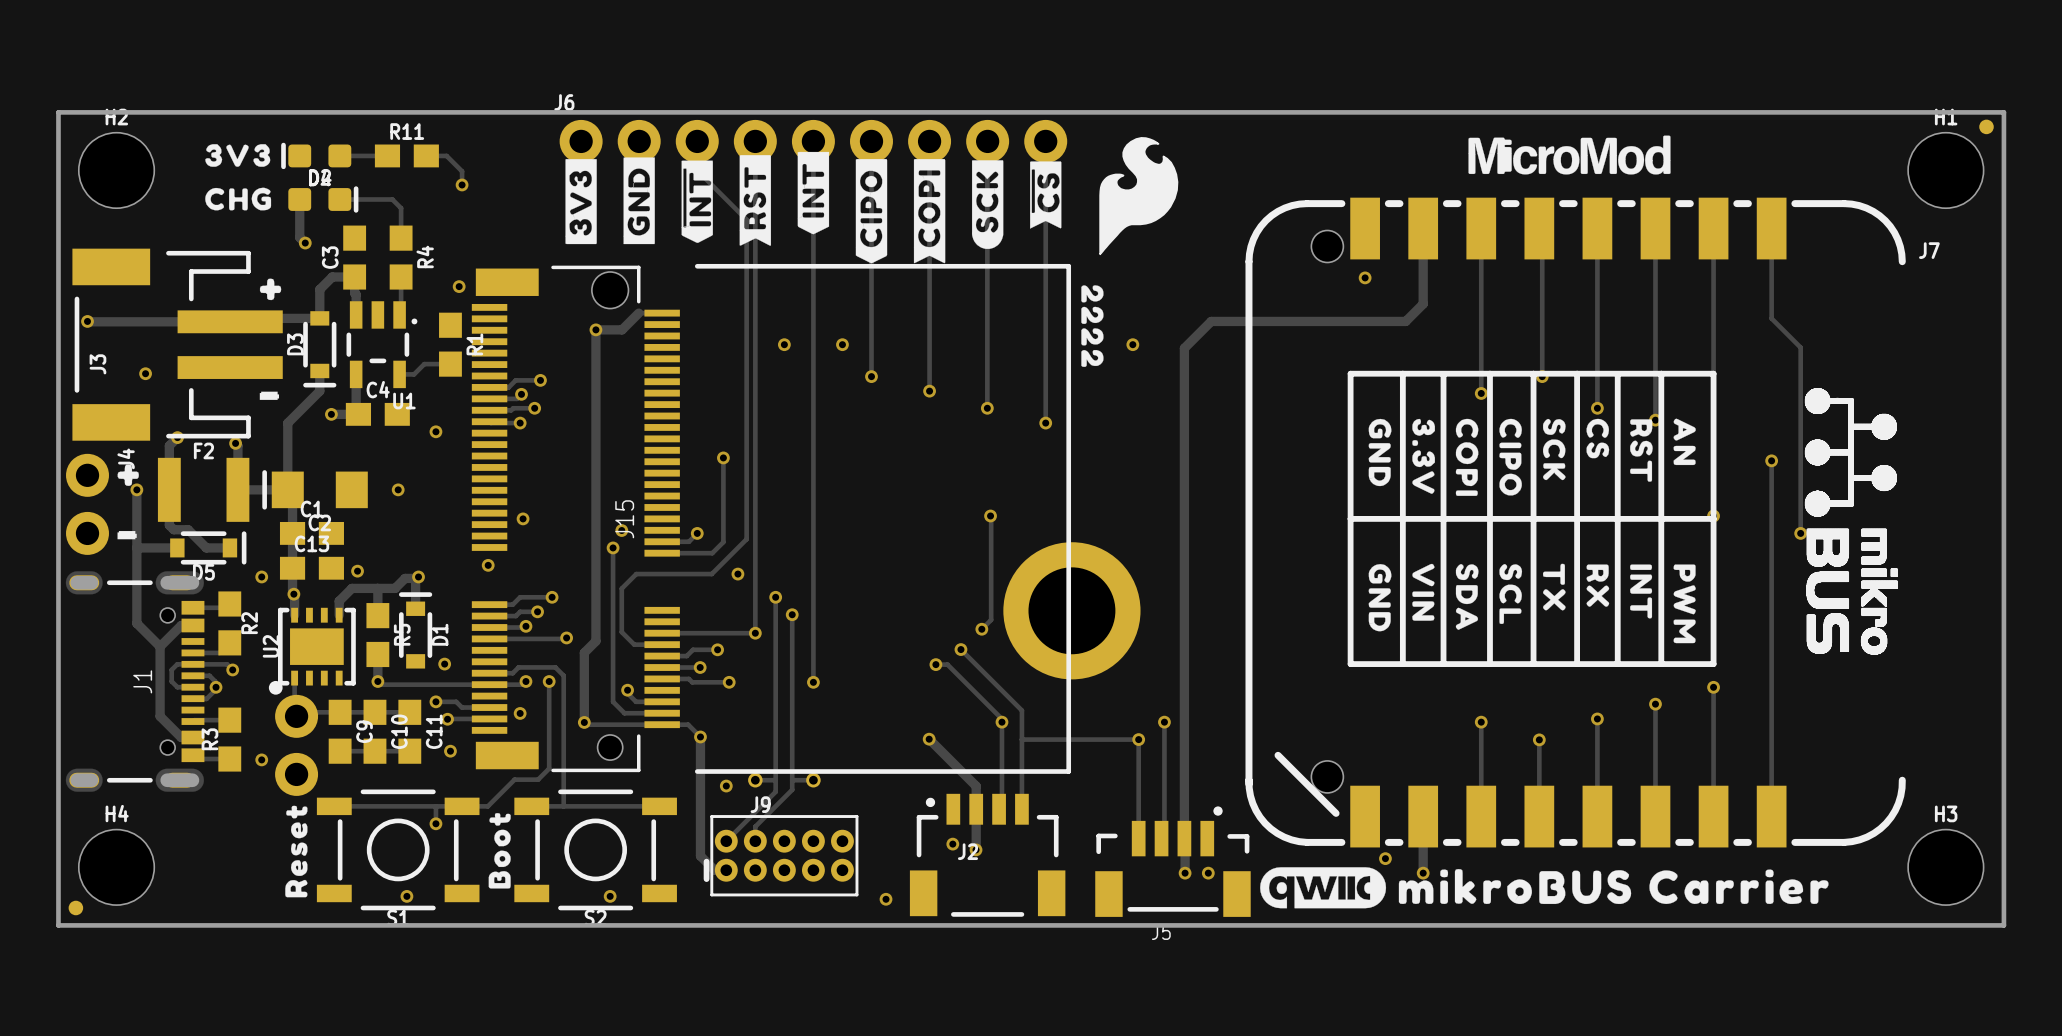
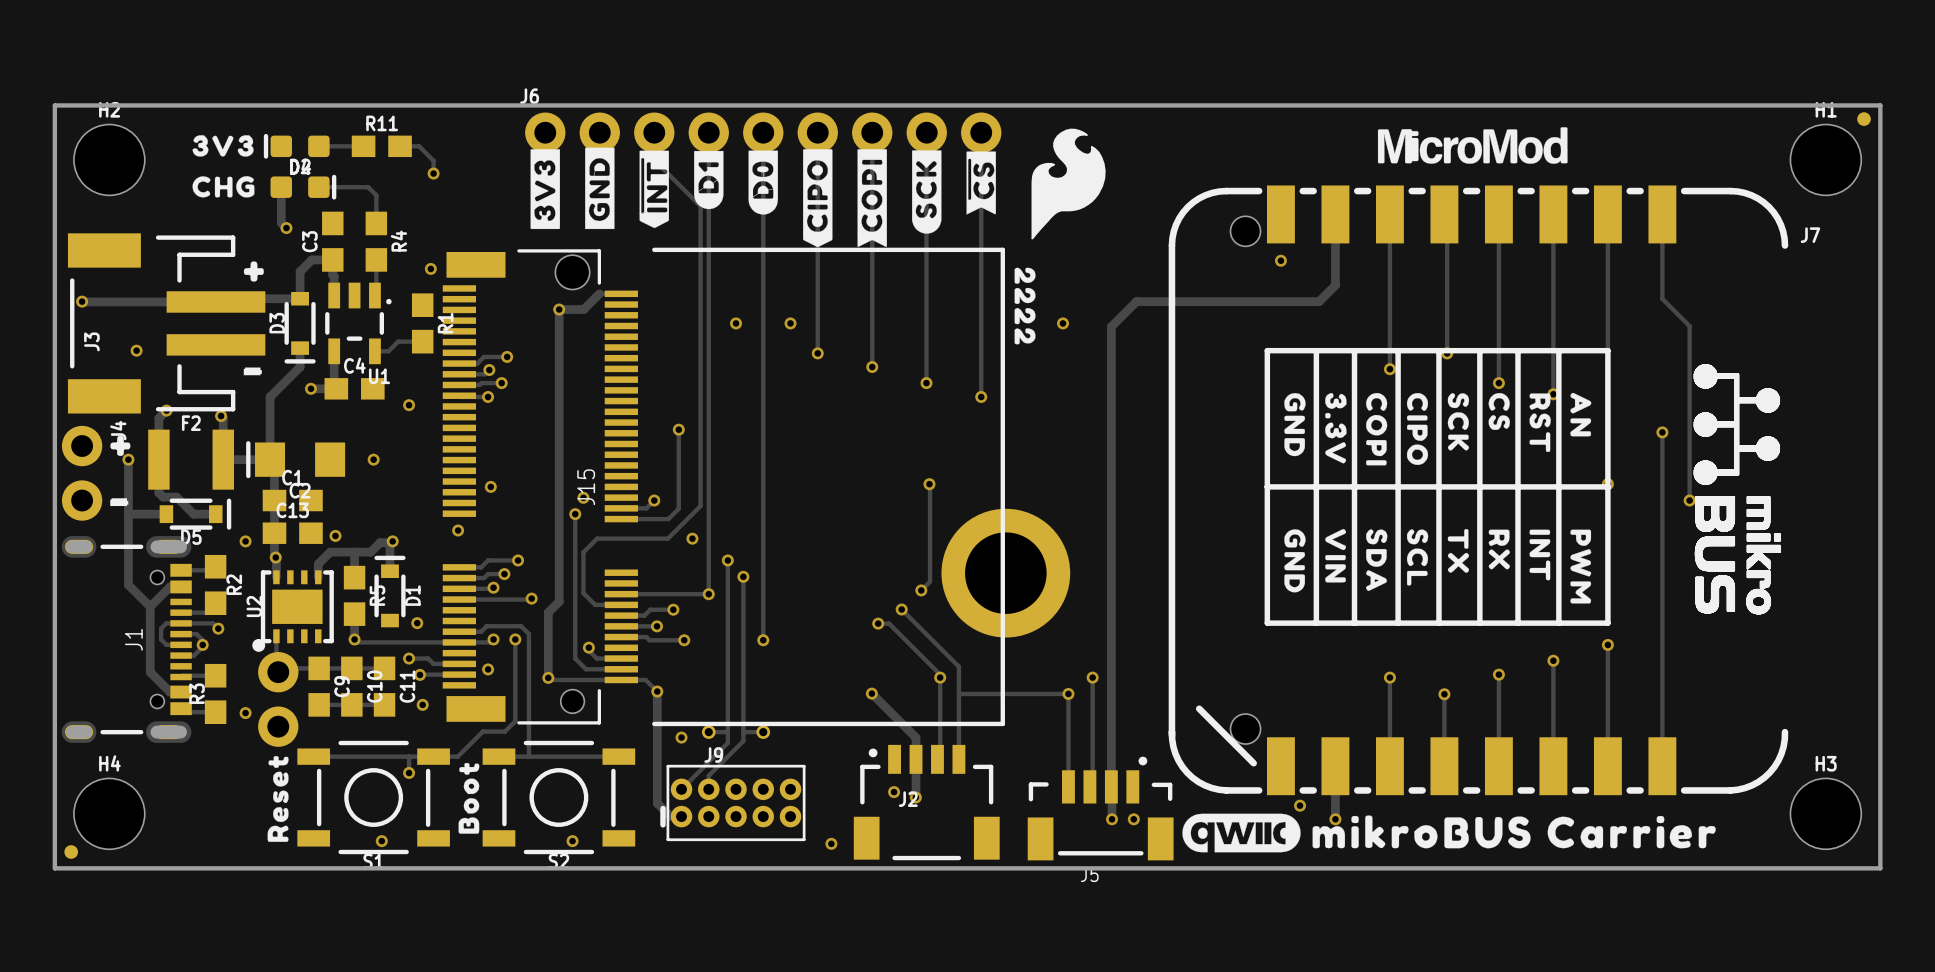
drawing shape: [797, 151, 830, 235] -> [748, 150, 778, 215]
drawing shape: [739, 155, 772, 246] -> [694, 150, 724, 210]

